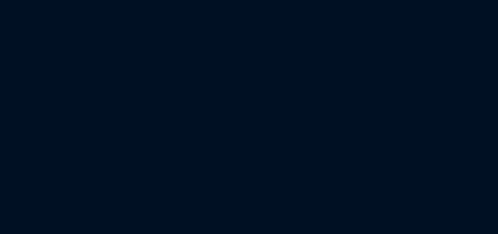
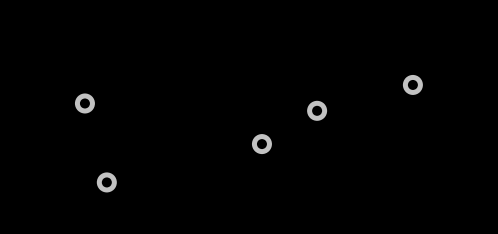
via: none -> (412, 84)
via: none -> (84, 103)
via: none -> (317, 110)
via: none -> (261, 144)
via: none -> (106, 182)

